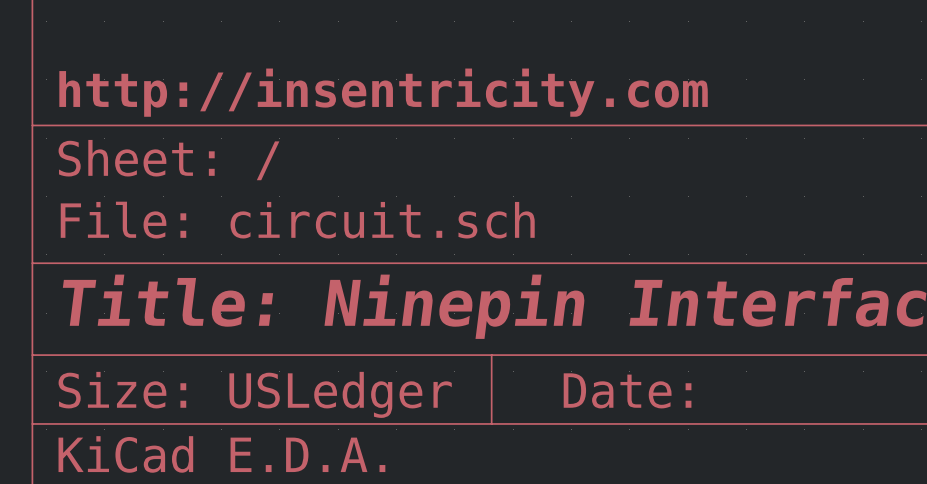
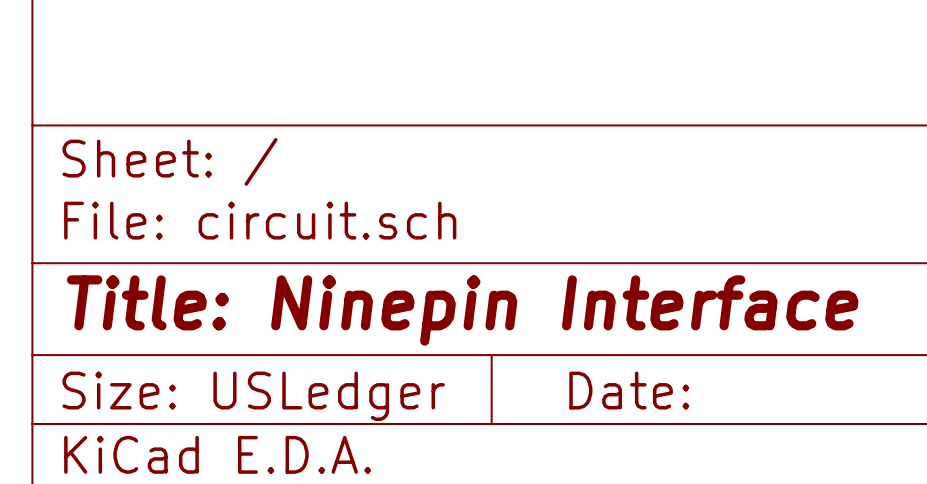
title block: http://insentricity.com (383, 92) -> none

